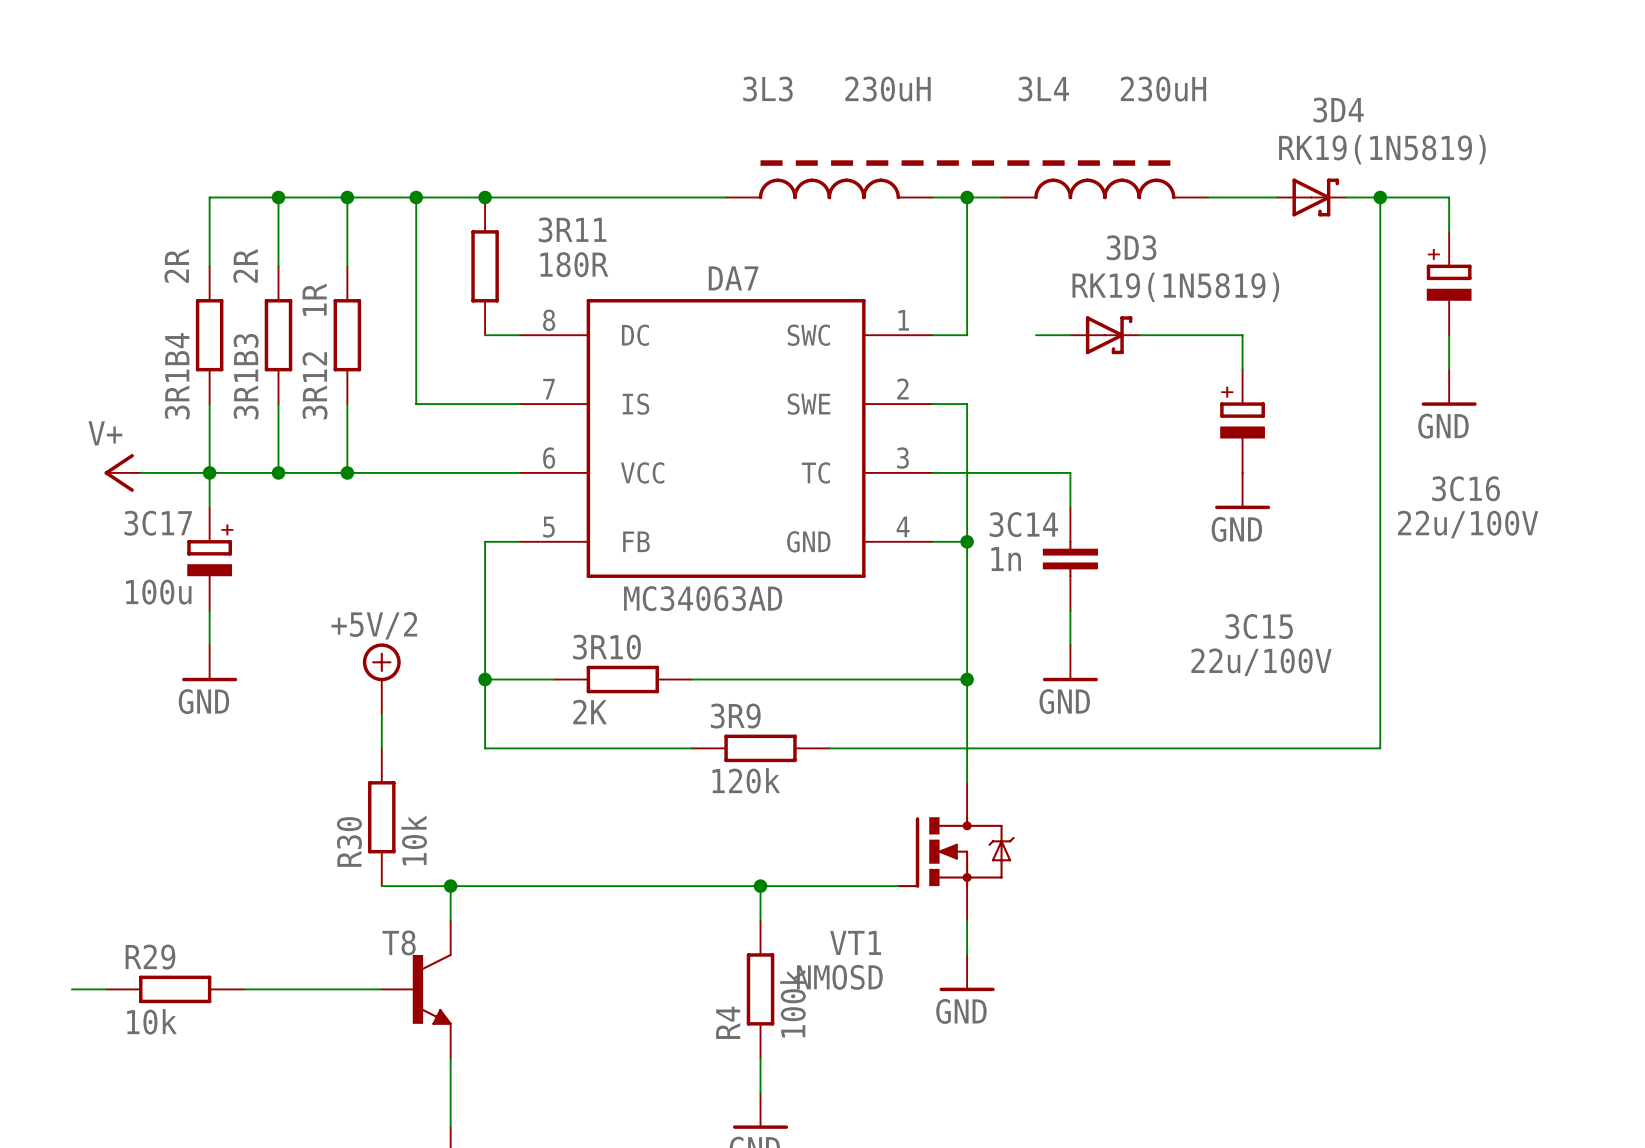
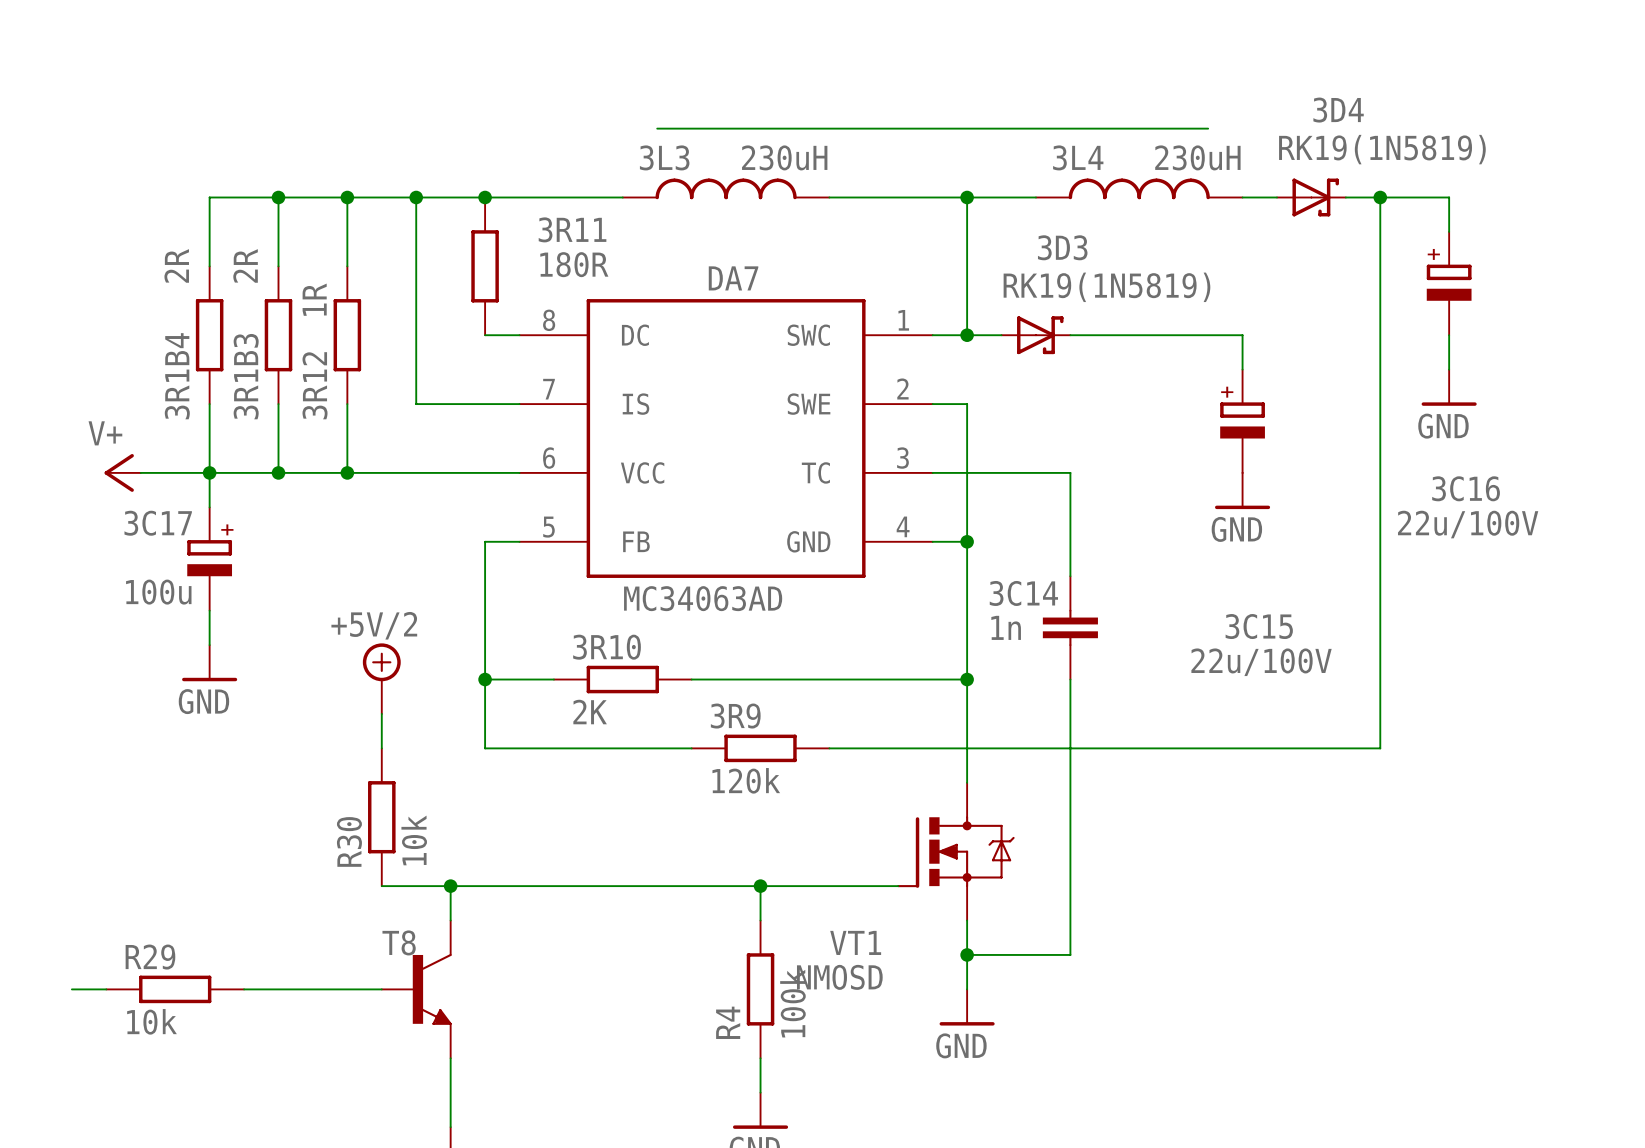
3L3 name position: 3L3 (767, 89) -> 3L3 (664, 157)
3L3 value position: 230uH (888, 89) -> 230uH (784, 157)
3L4 name position: 3L4 (1043, 89) -> 3L4 (1078, 157)
3L4 value position: 230uH (1163, 89) -> 230uH (1197, 157)
wire: none -> (657, 128) (1208, 128)
line: (760, 163) (1173, 163) -> none
3L3 position: (829, 188) -> (726, 188)
3L4 position: (1104, 188) -> (1139, 188)
wire: (622, 197) (726, 197) -> (829, 197) (932, 197)
wire: none -> (967, 335) (1001, 335)
junction: none -> (967, 335)
3D3 position: (1104, 335) -> (1035, 335)
3C14 position: (1070, 559) -> (1070, 627)
power symbol: GND (1070, 663) -> none
wire: none -> (1070, 679) (1070, 954) (967, 954) (967, 989)
junction: none -> (967, 954)
power symbol position: GND (967, 973) -> GND (967, 1007)

